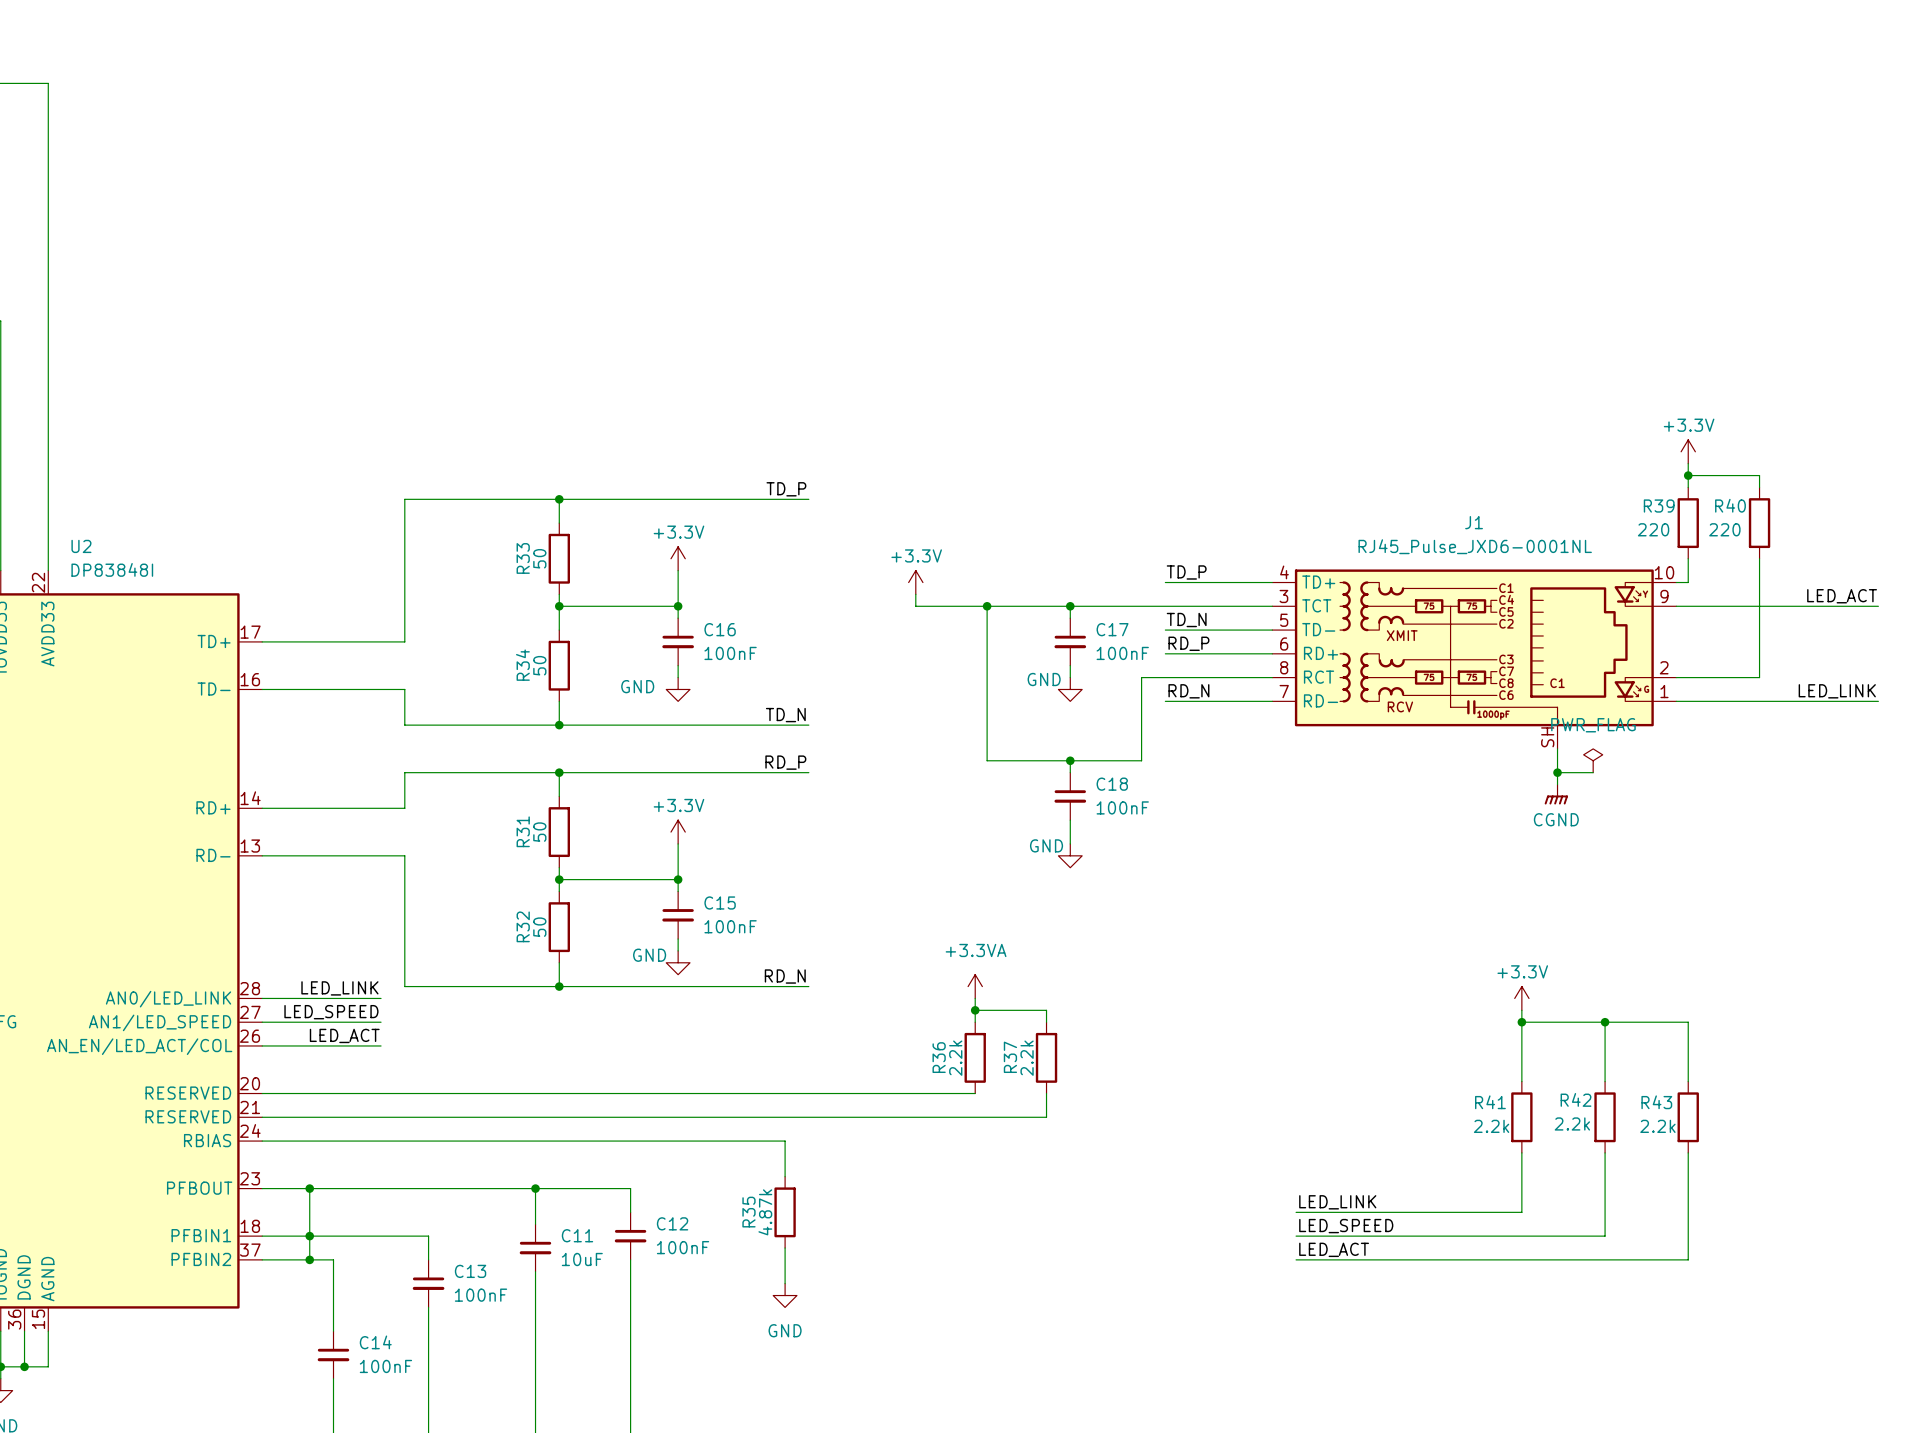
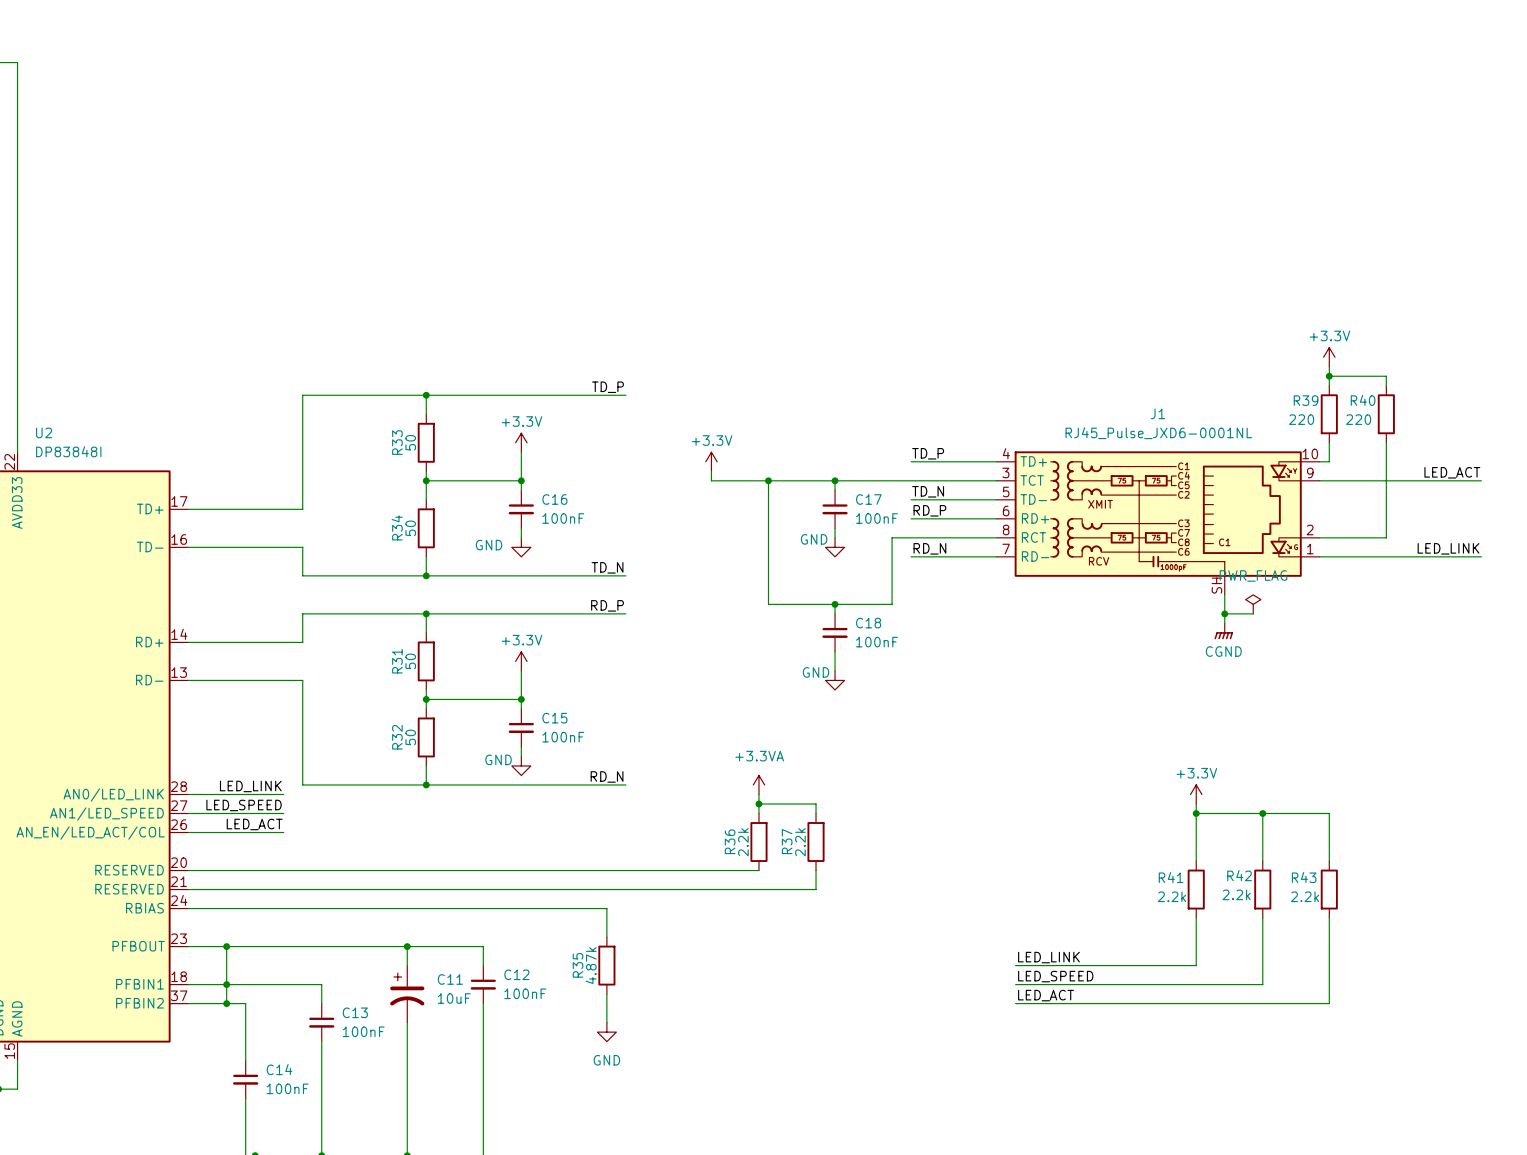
C11 symbol: [519, 1224, 552, 1272] -> [390, 965, 425, 1023]

